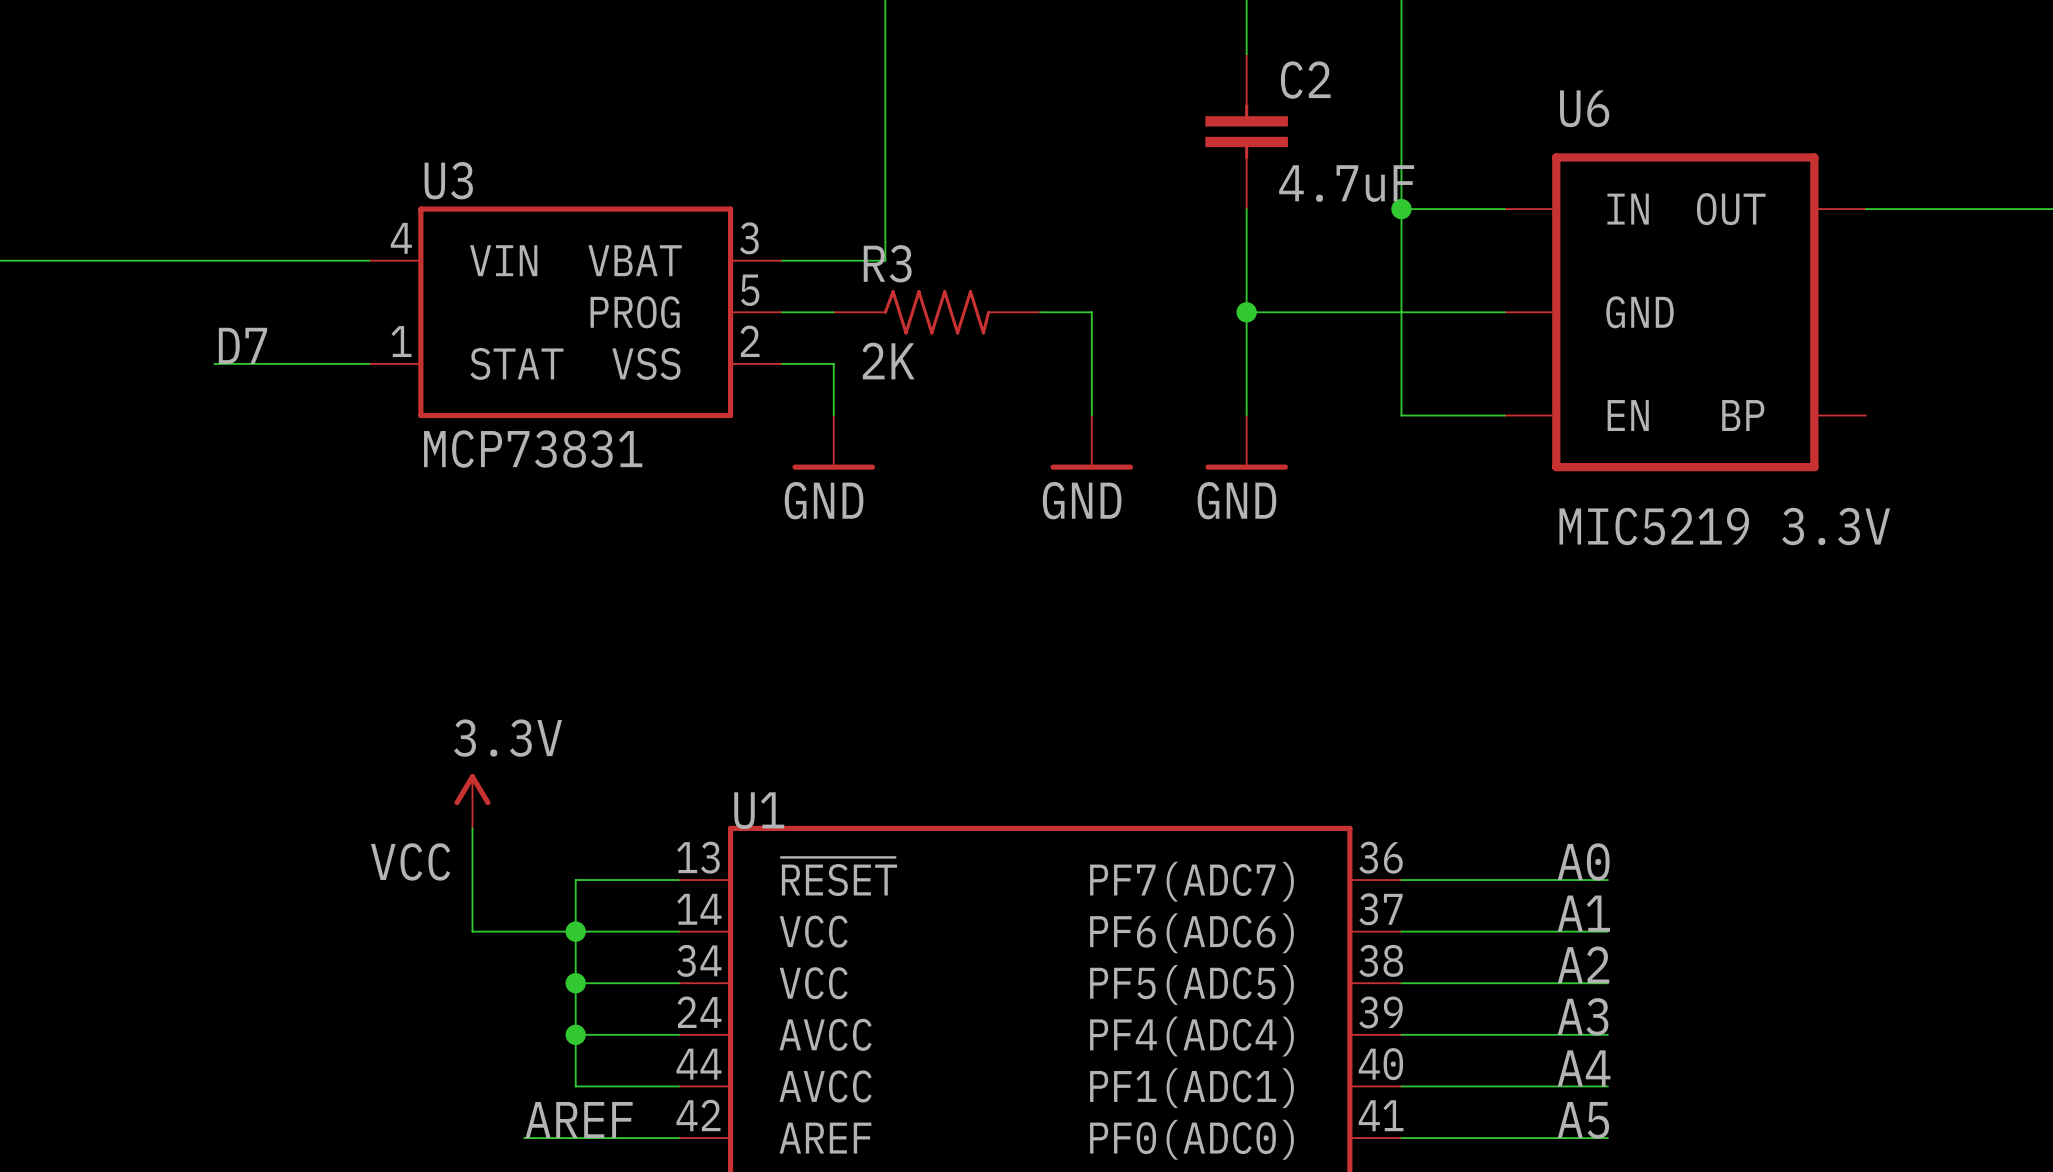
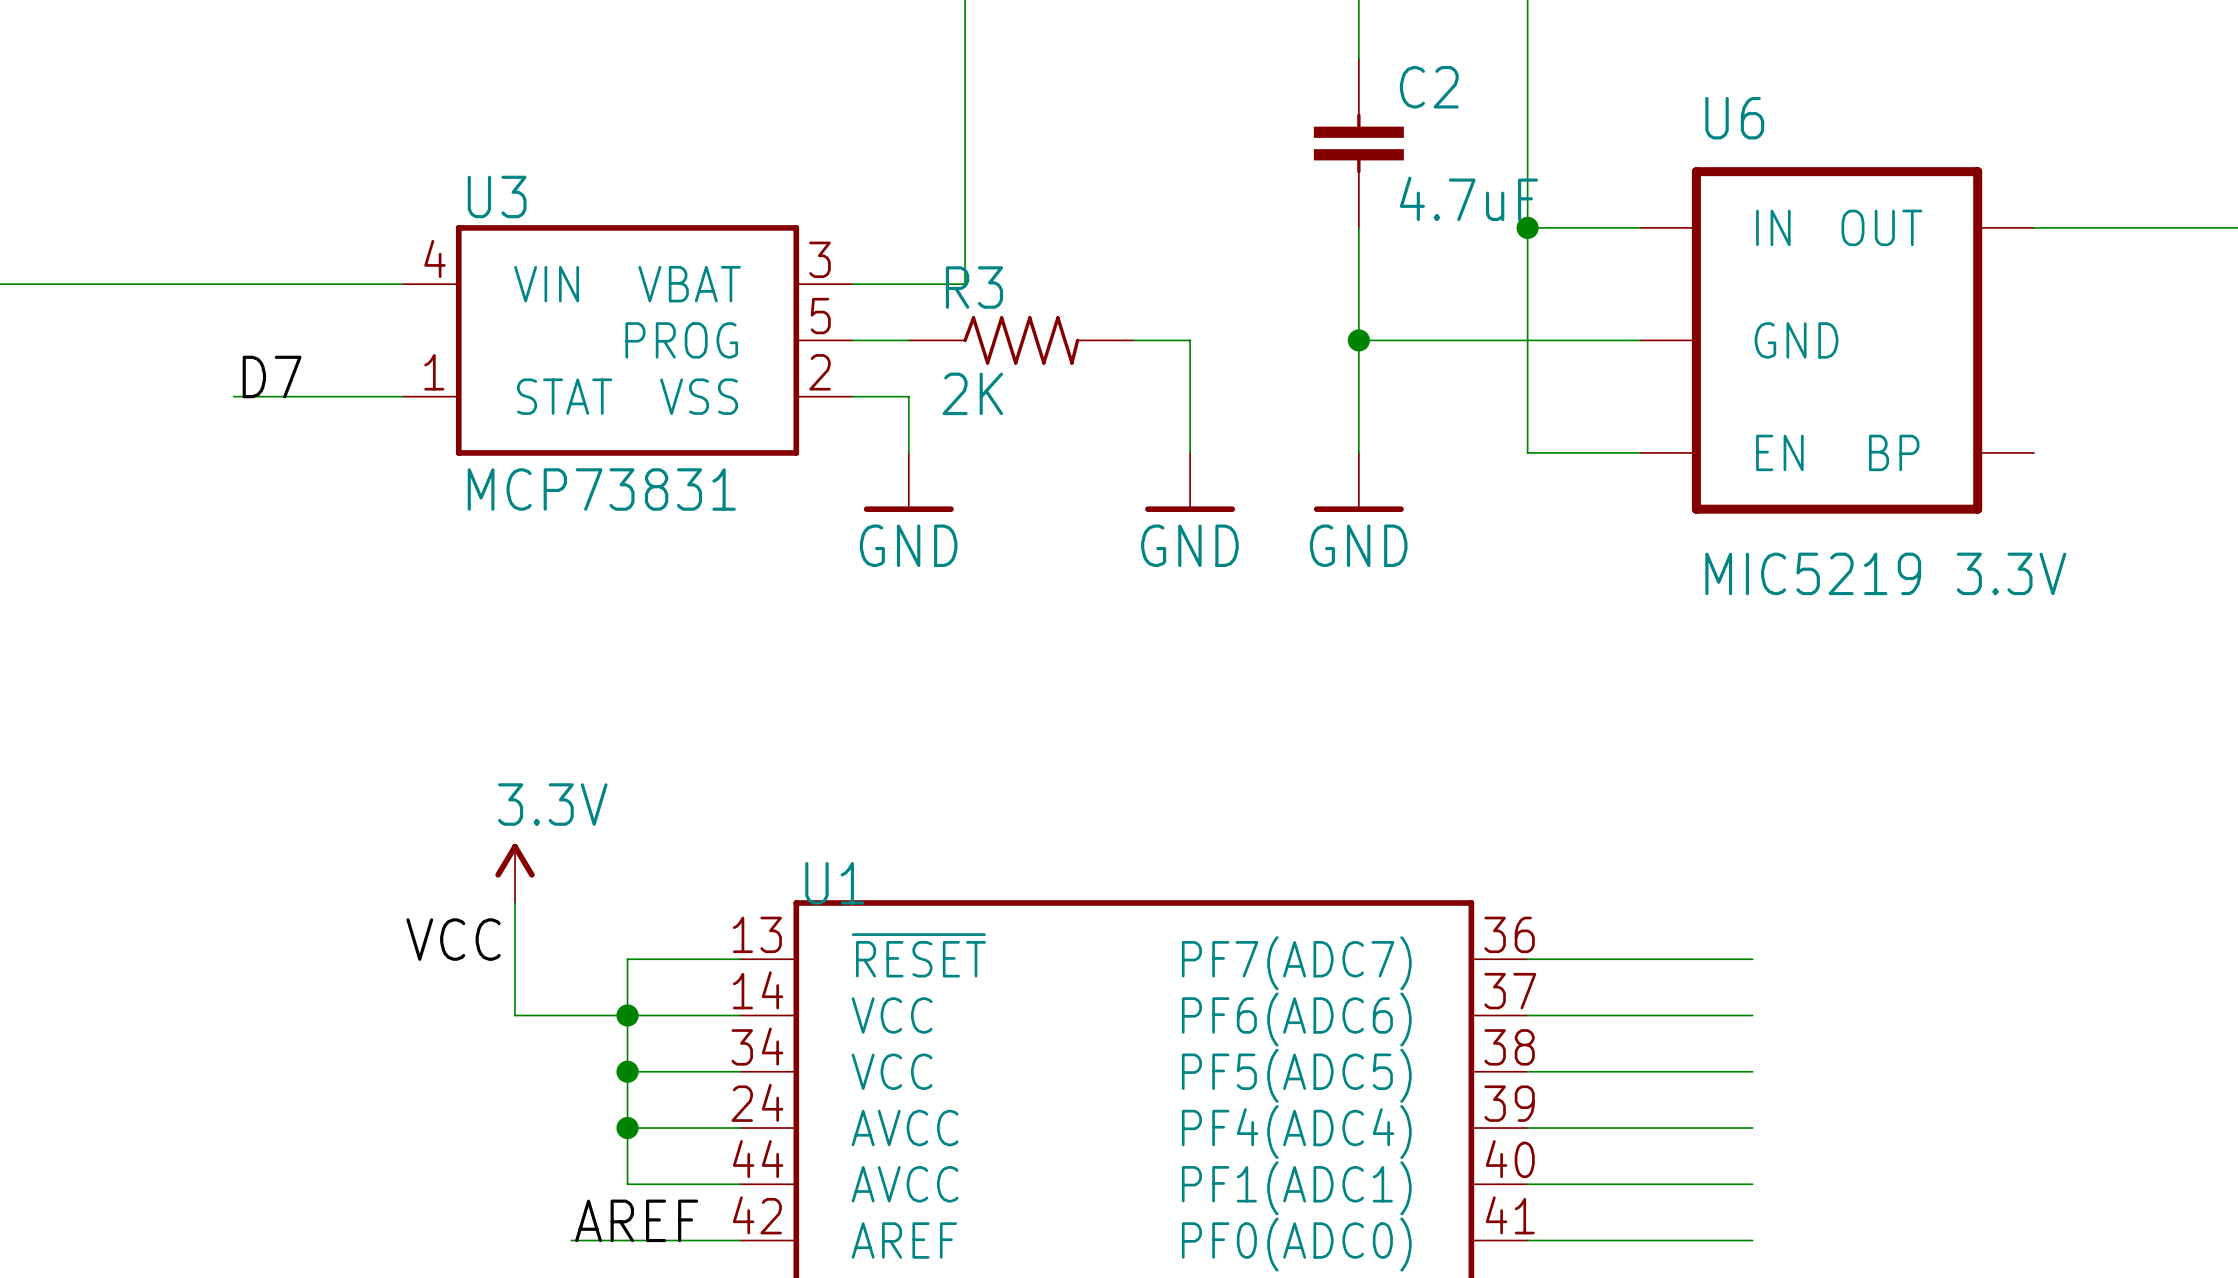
label: A0 (1583, 861) -> none
label: A1 (1583, 913) -> none
label: A2 (1583, 964) -> none
label: A3 (1583, 1016) -> none
label: A4 (1584, 1068) -> none
label: A5 (1583, 1120) -> none

